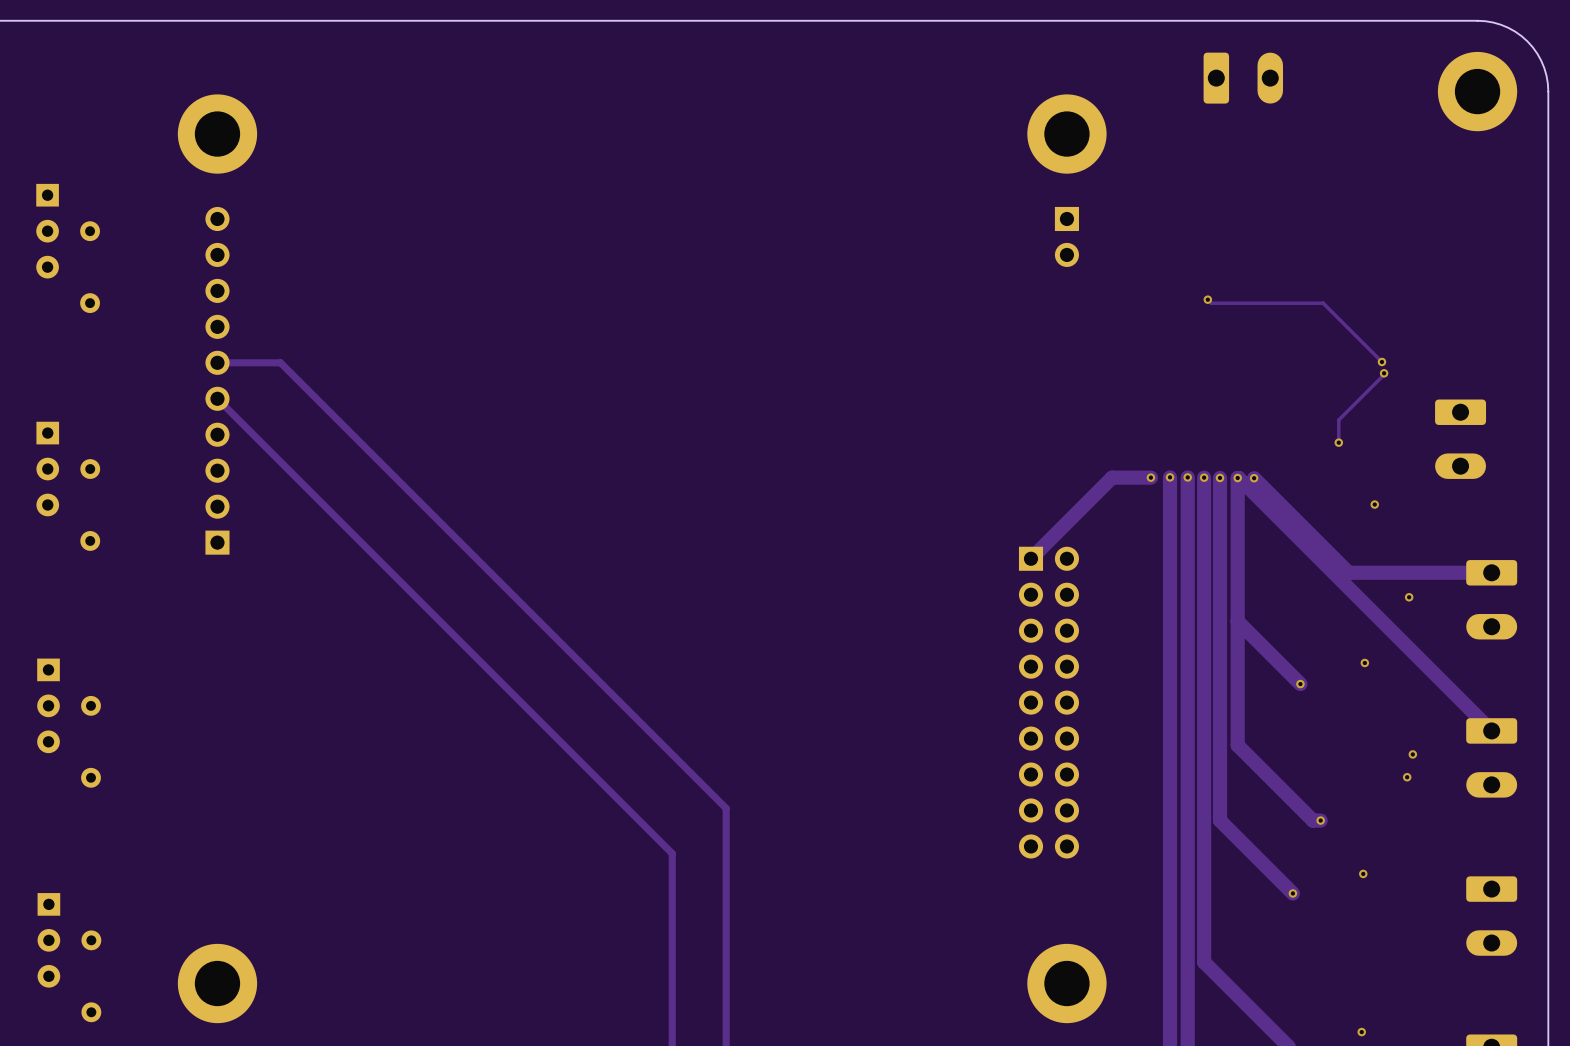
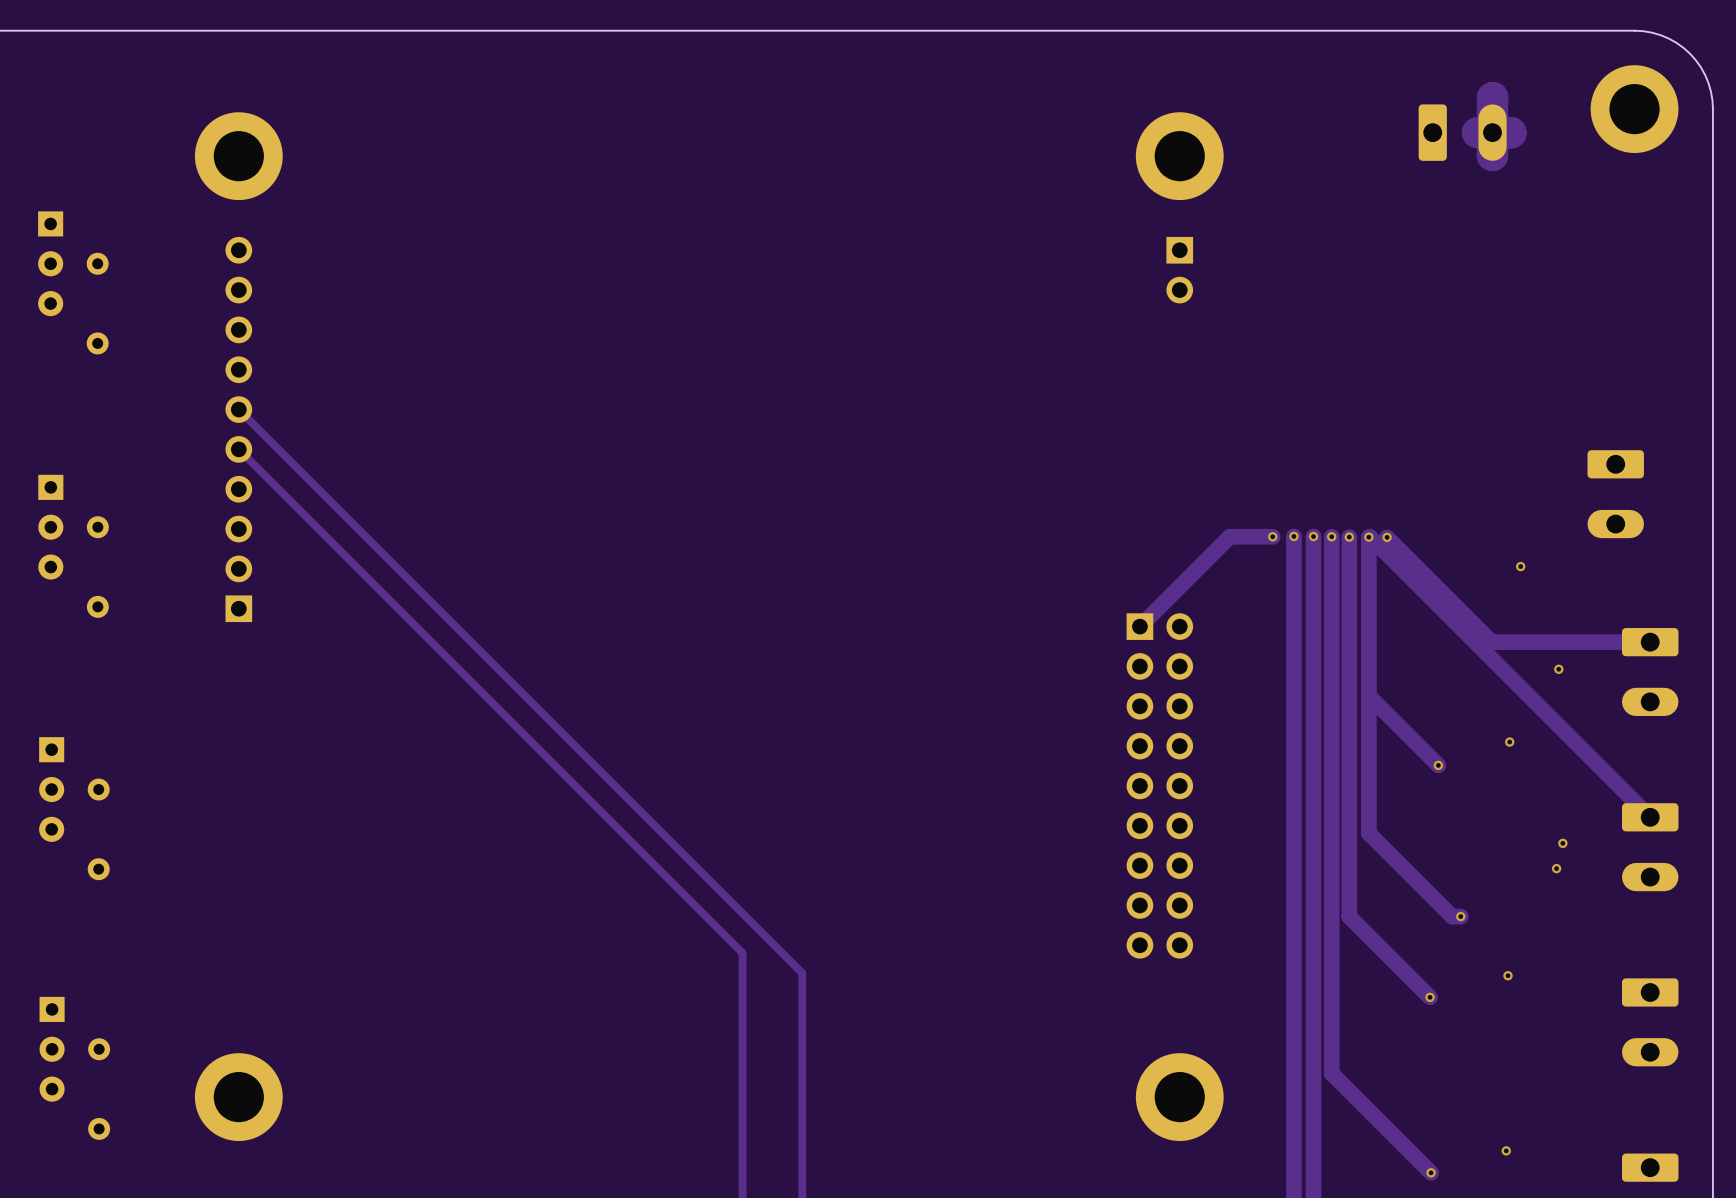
part position: (1243, 78) -> (1462, 132)
track: none -> (1492, 97) (1492, 155)
track: none -> (1477, 132) (1511, 132)
track: (1207, 299) (1211, 303) (1323, 303) (1381, 361) -> none
via: (1207, 299) -> none
via: (1381, 361) -> none
track: (217, 362) (280, 362) (726, 808) (726, 871) -> (238, 409) (802, 973)
track: (1384, 373) (1338, 420) (1338, 442) -> none
via: (1384, 373) -> none
via: (1338, 442) -> none

